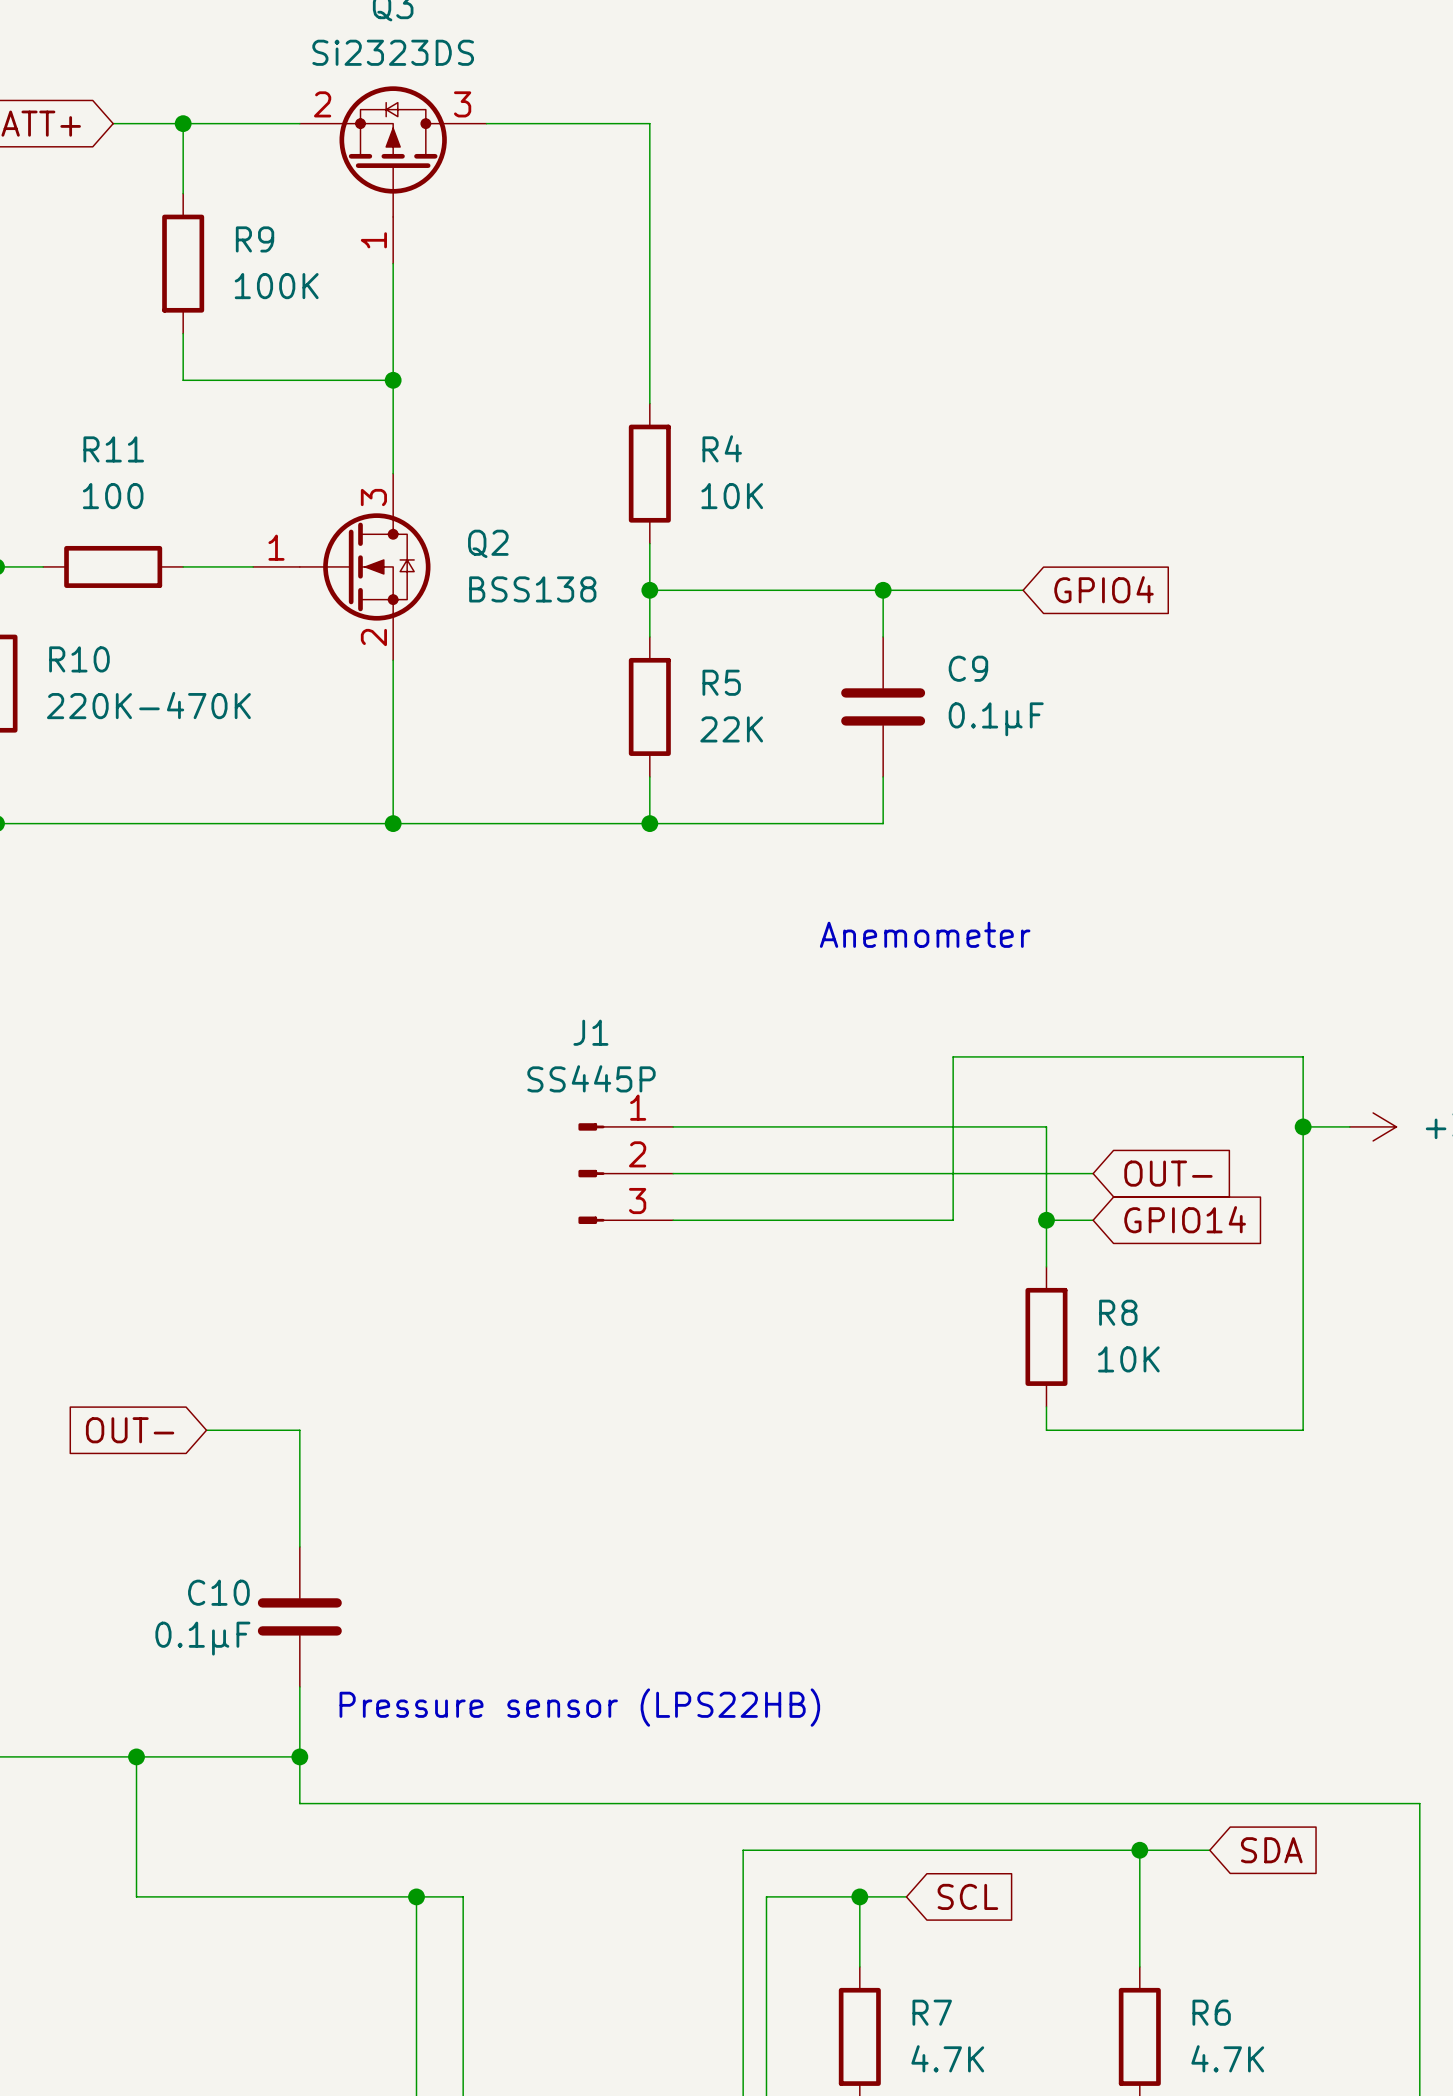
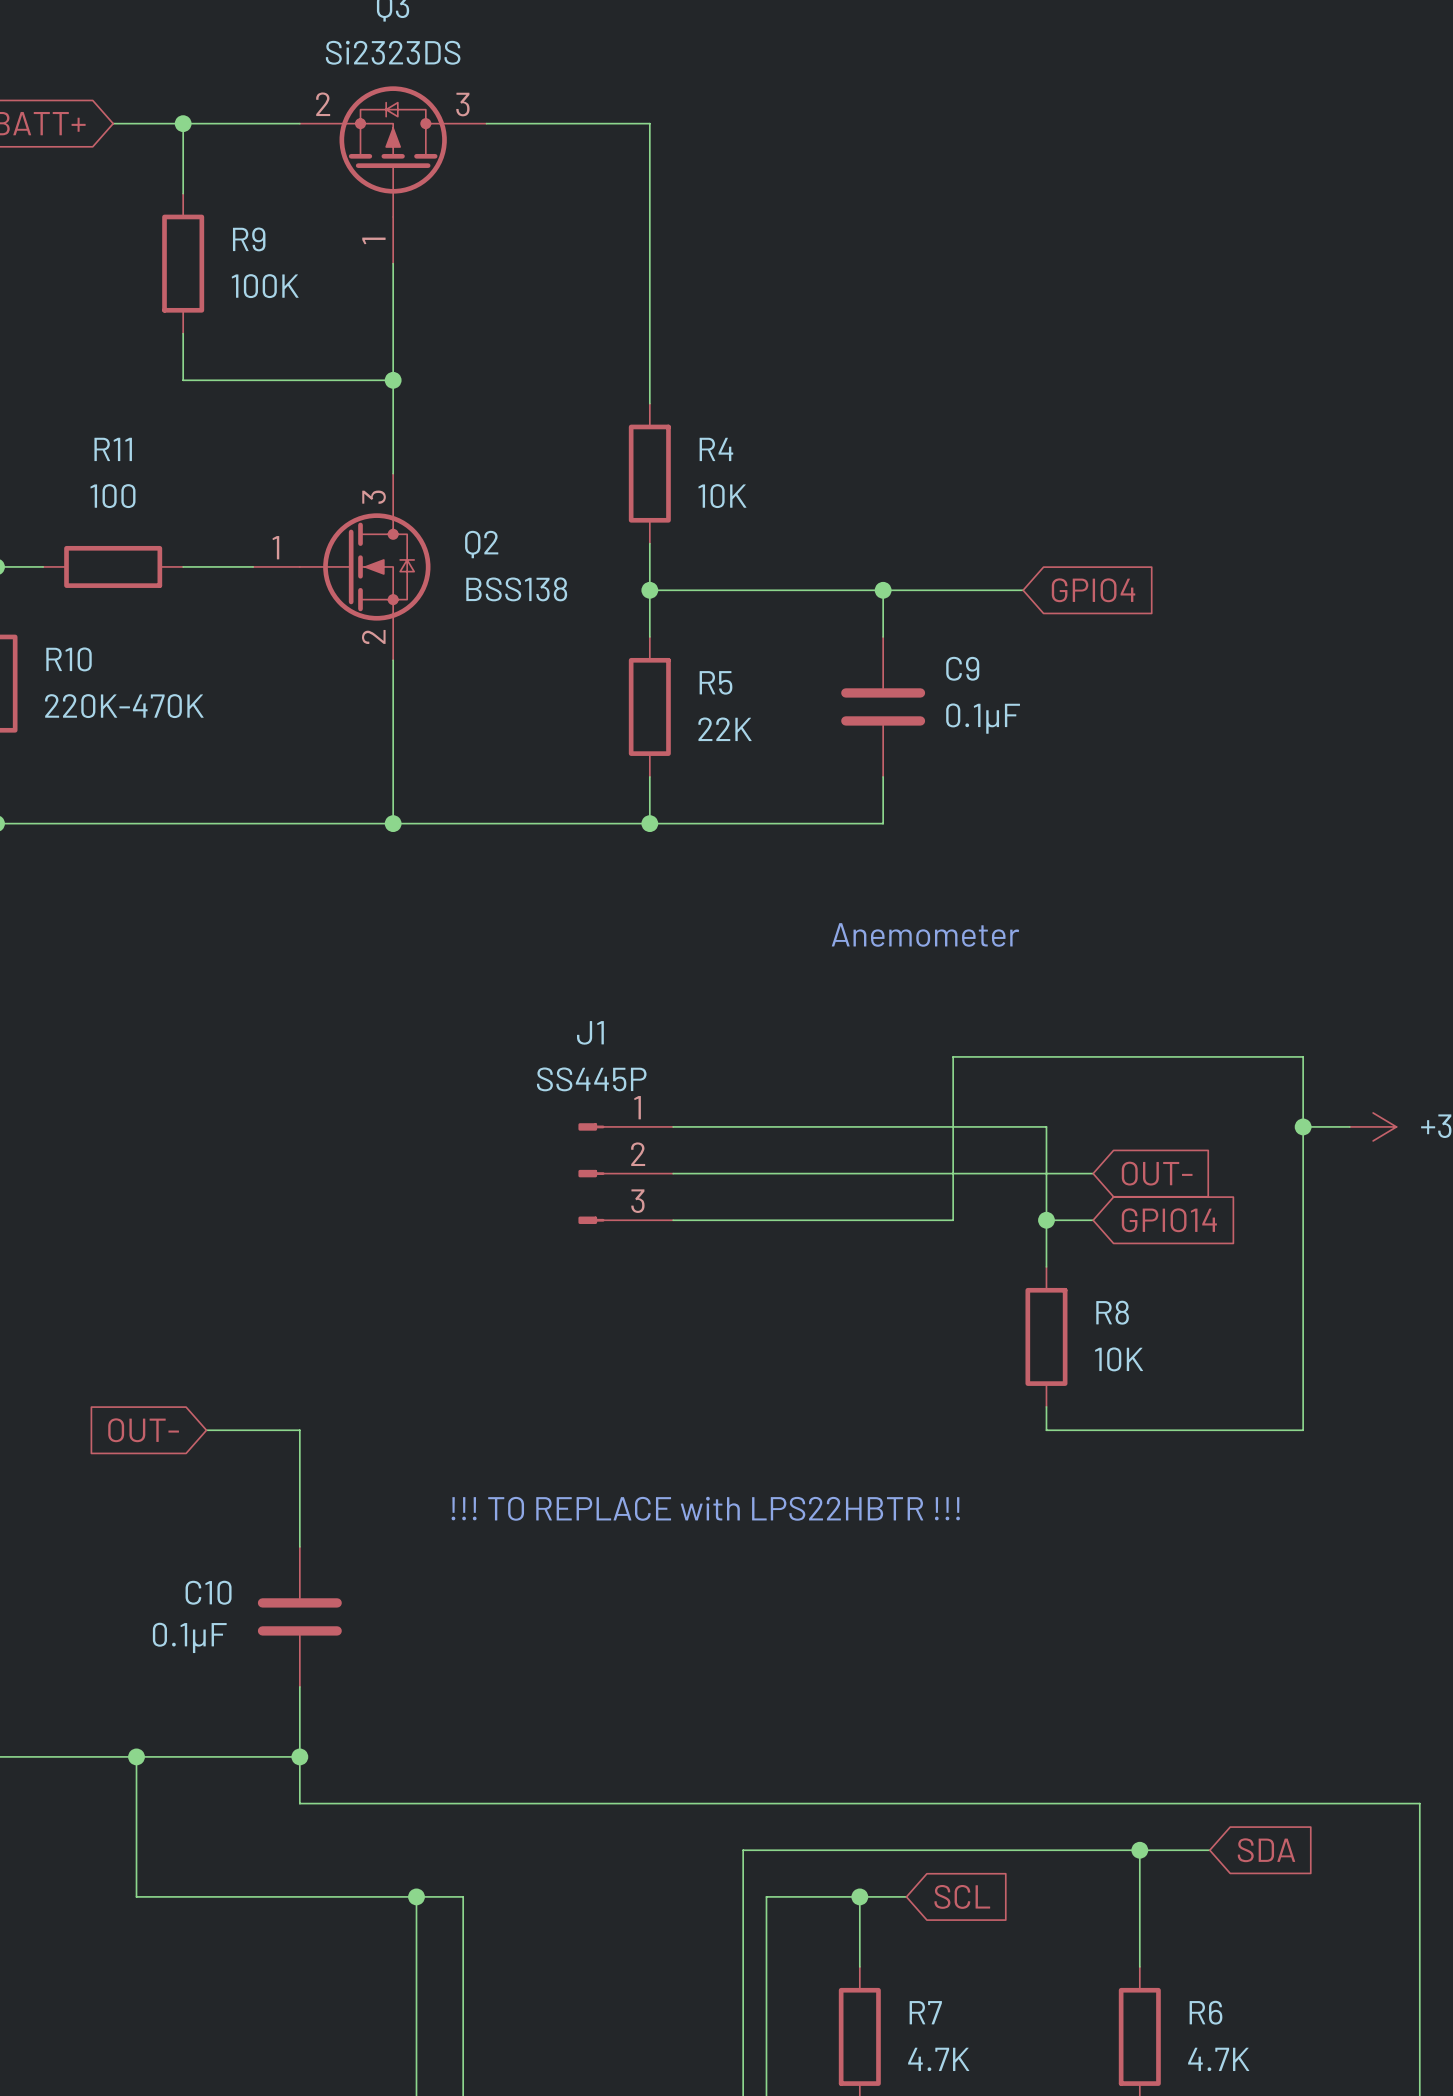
text: none -> !!! TO REPLACE with LPS22HBTR !!! (705, 1508)
text: Pressure sensor (LPS22HB) (579, 1707) -> none

